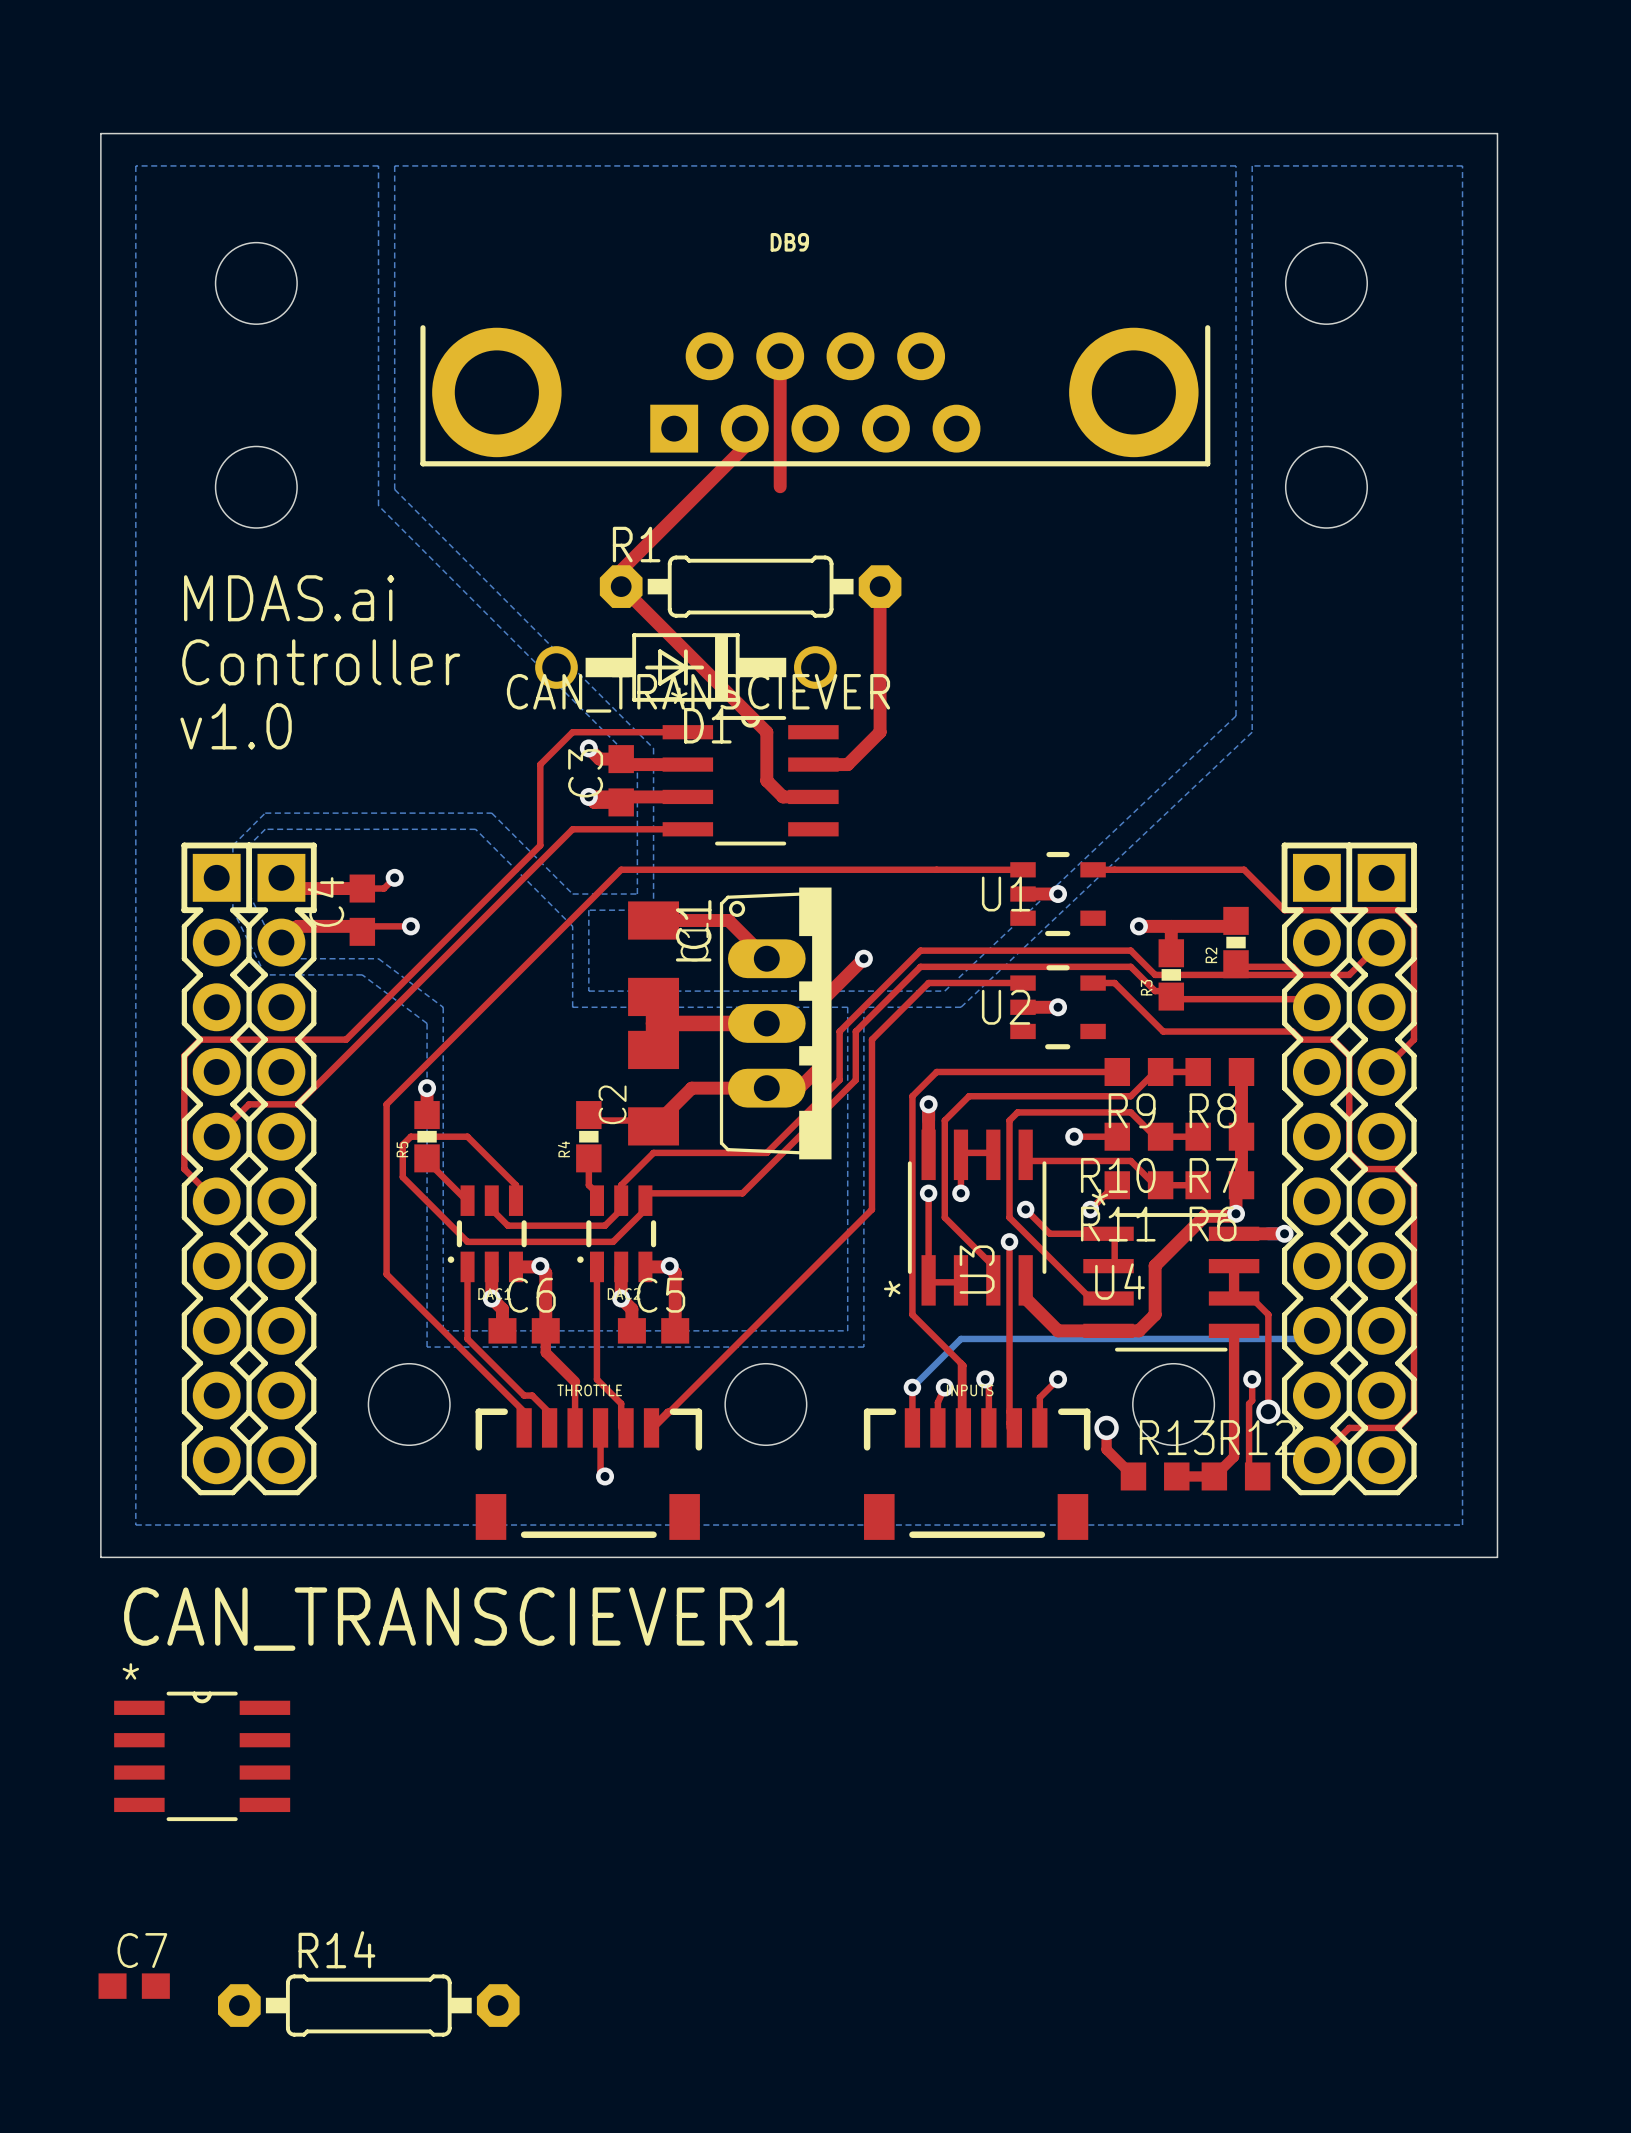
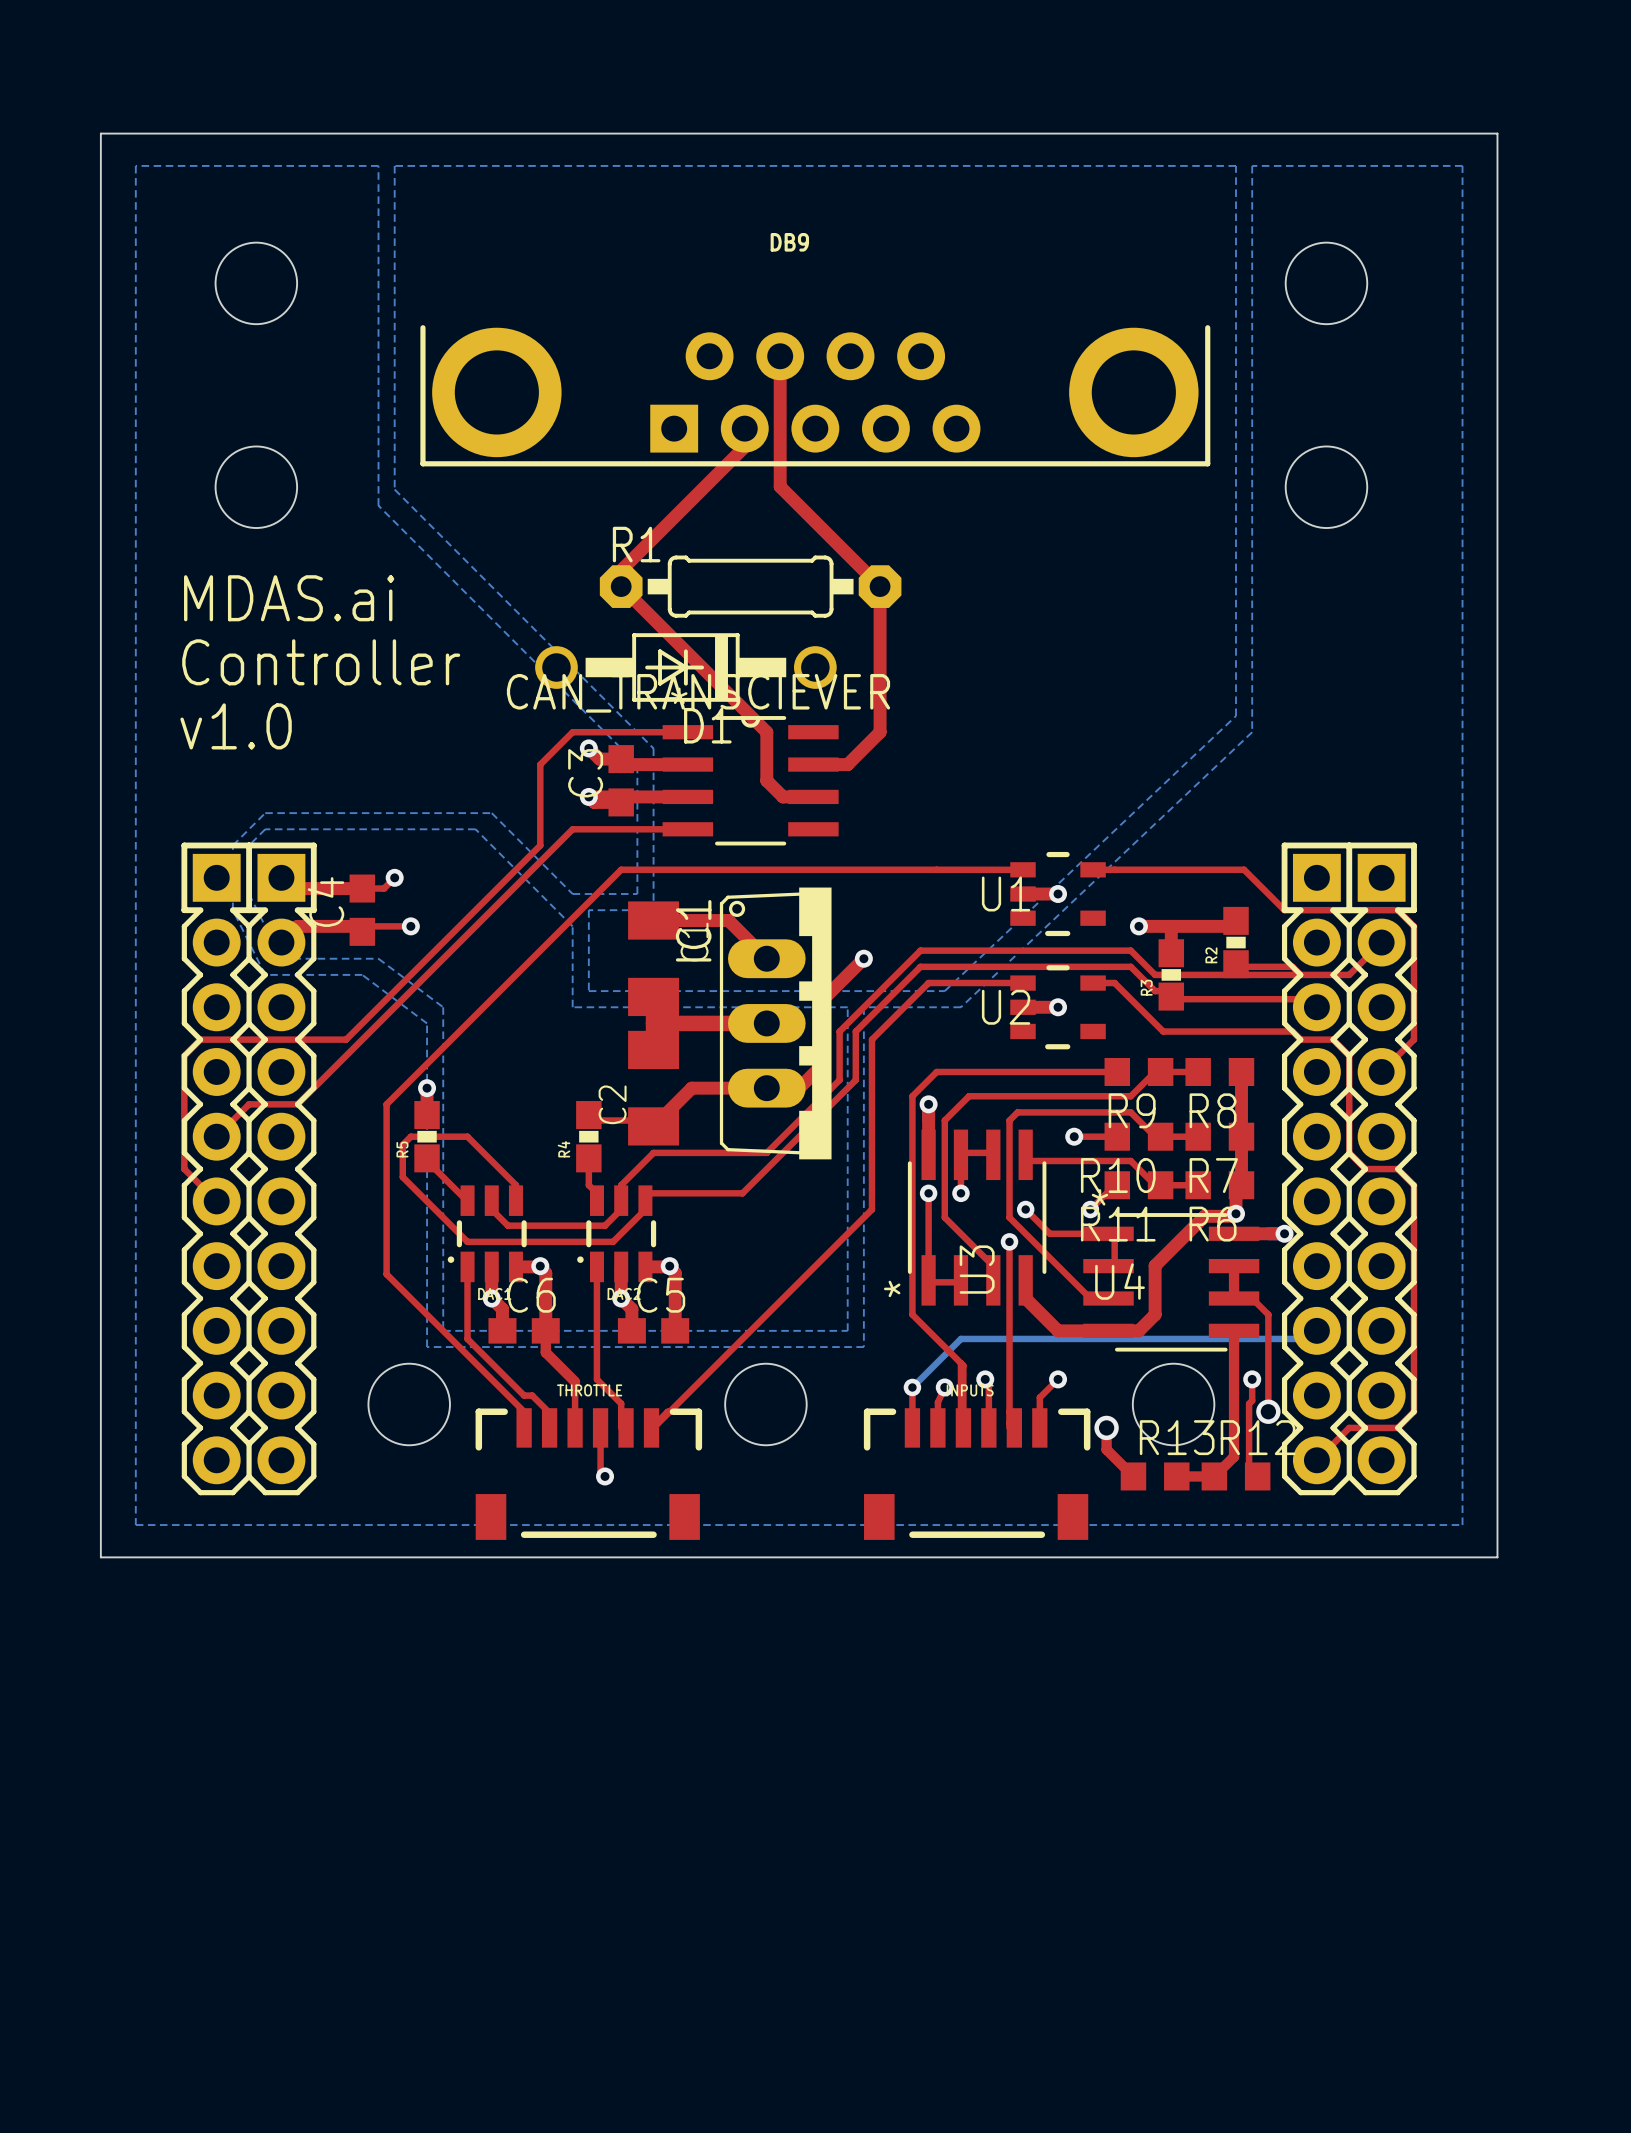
top track: none -> (780, 486) (880, 586)
CAN_TRANSCIEVER1: (202, 1756) -> none
C7: (134, 1986) -> none
R14: (368, 2005) -> none

